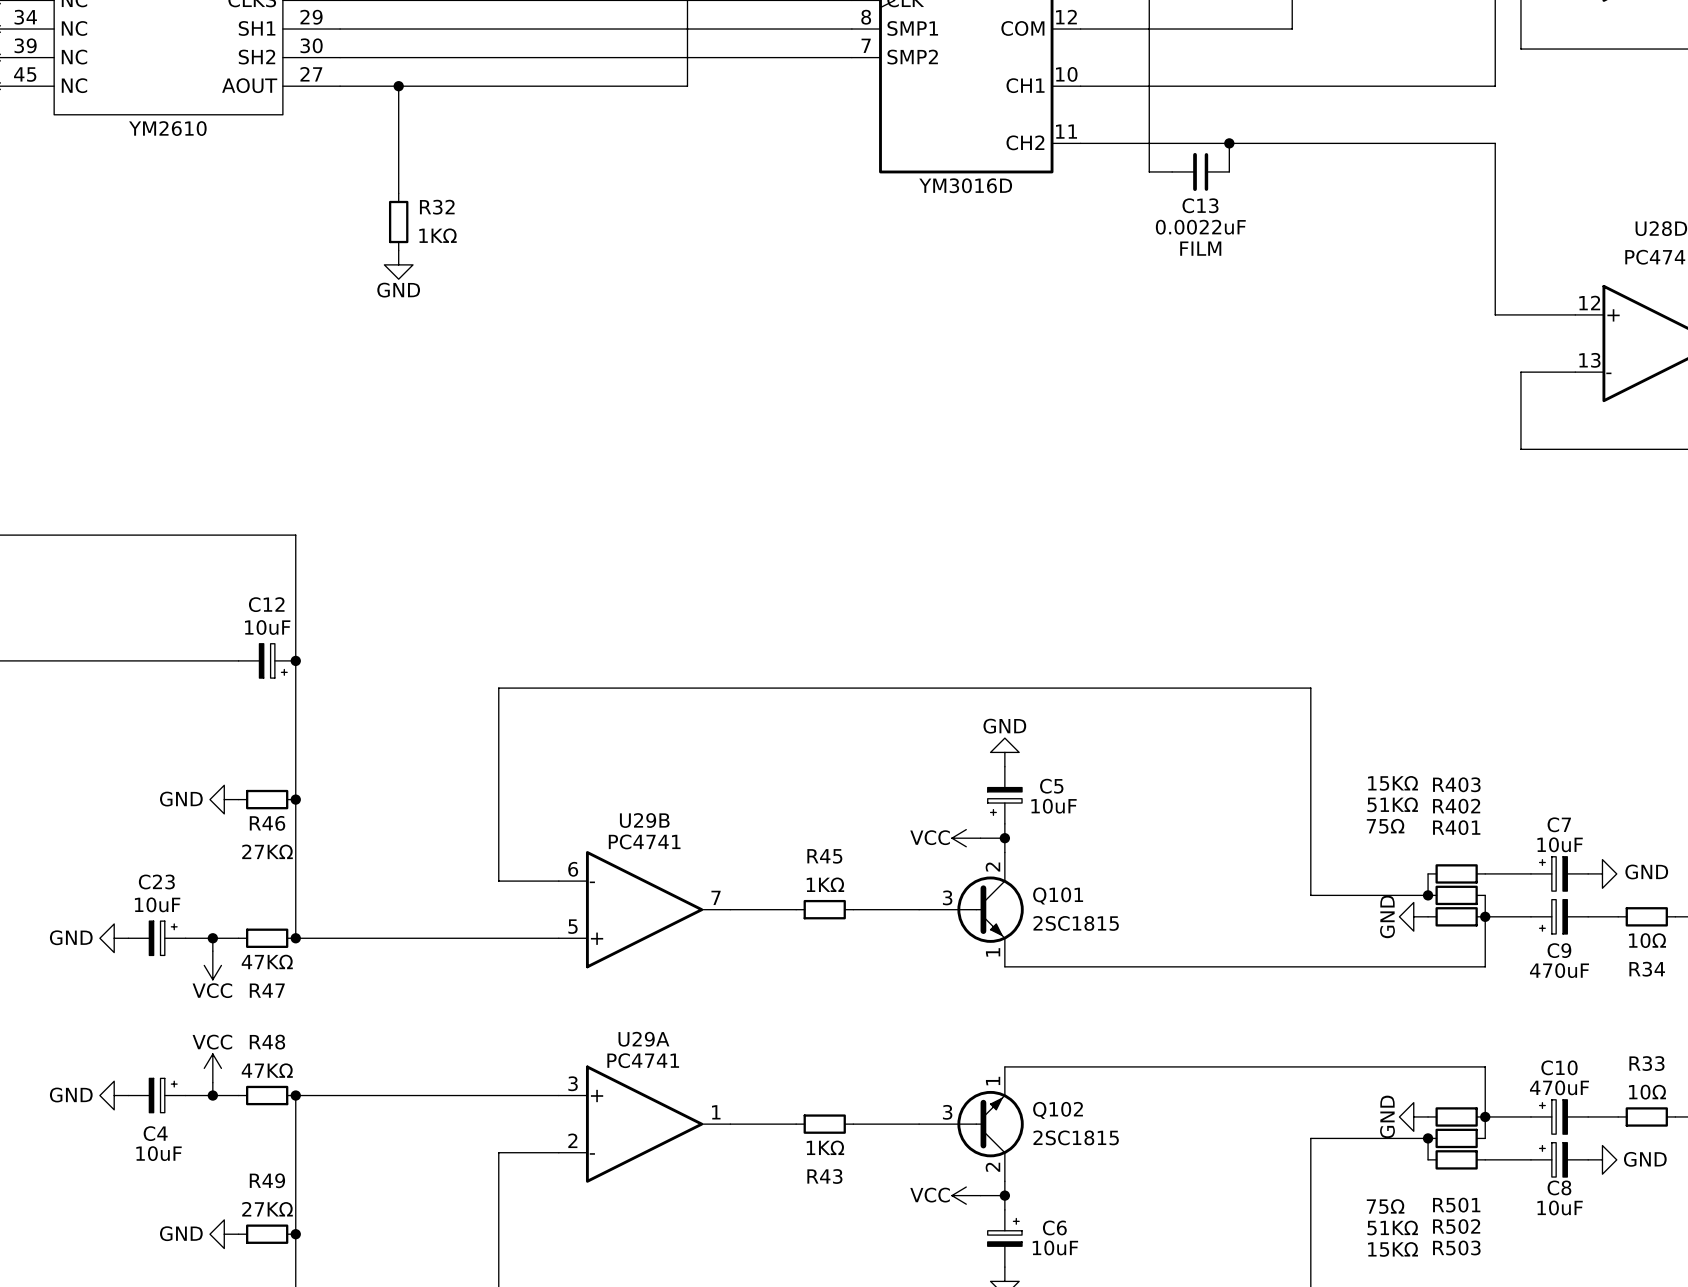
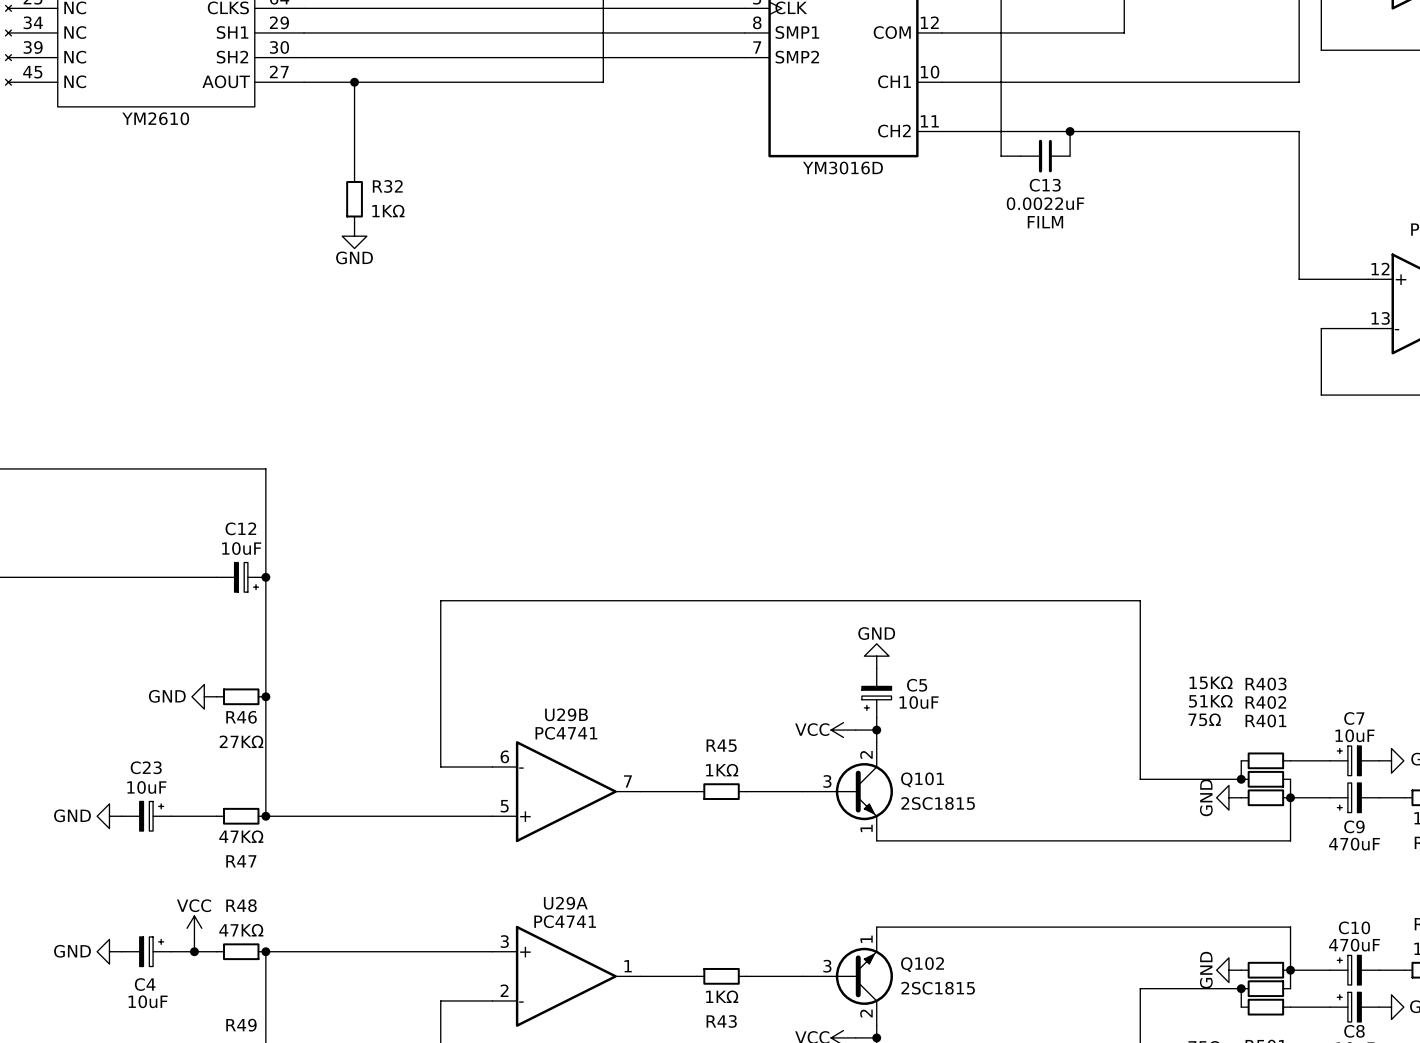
wire: (212, 938) (212, 951) -> none
junction: (212, 938) -> none
power symbol: VCC (212, 965) -> none

